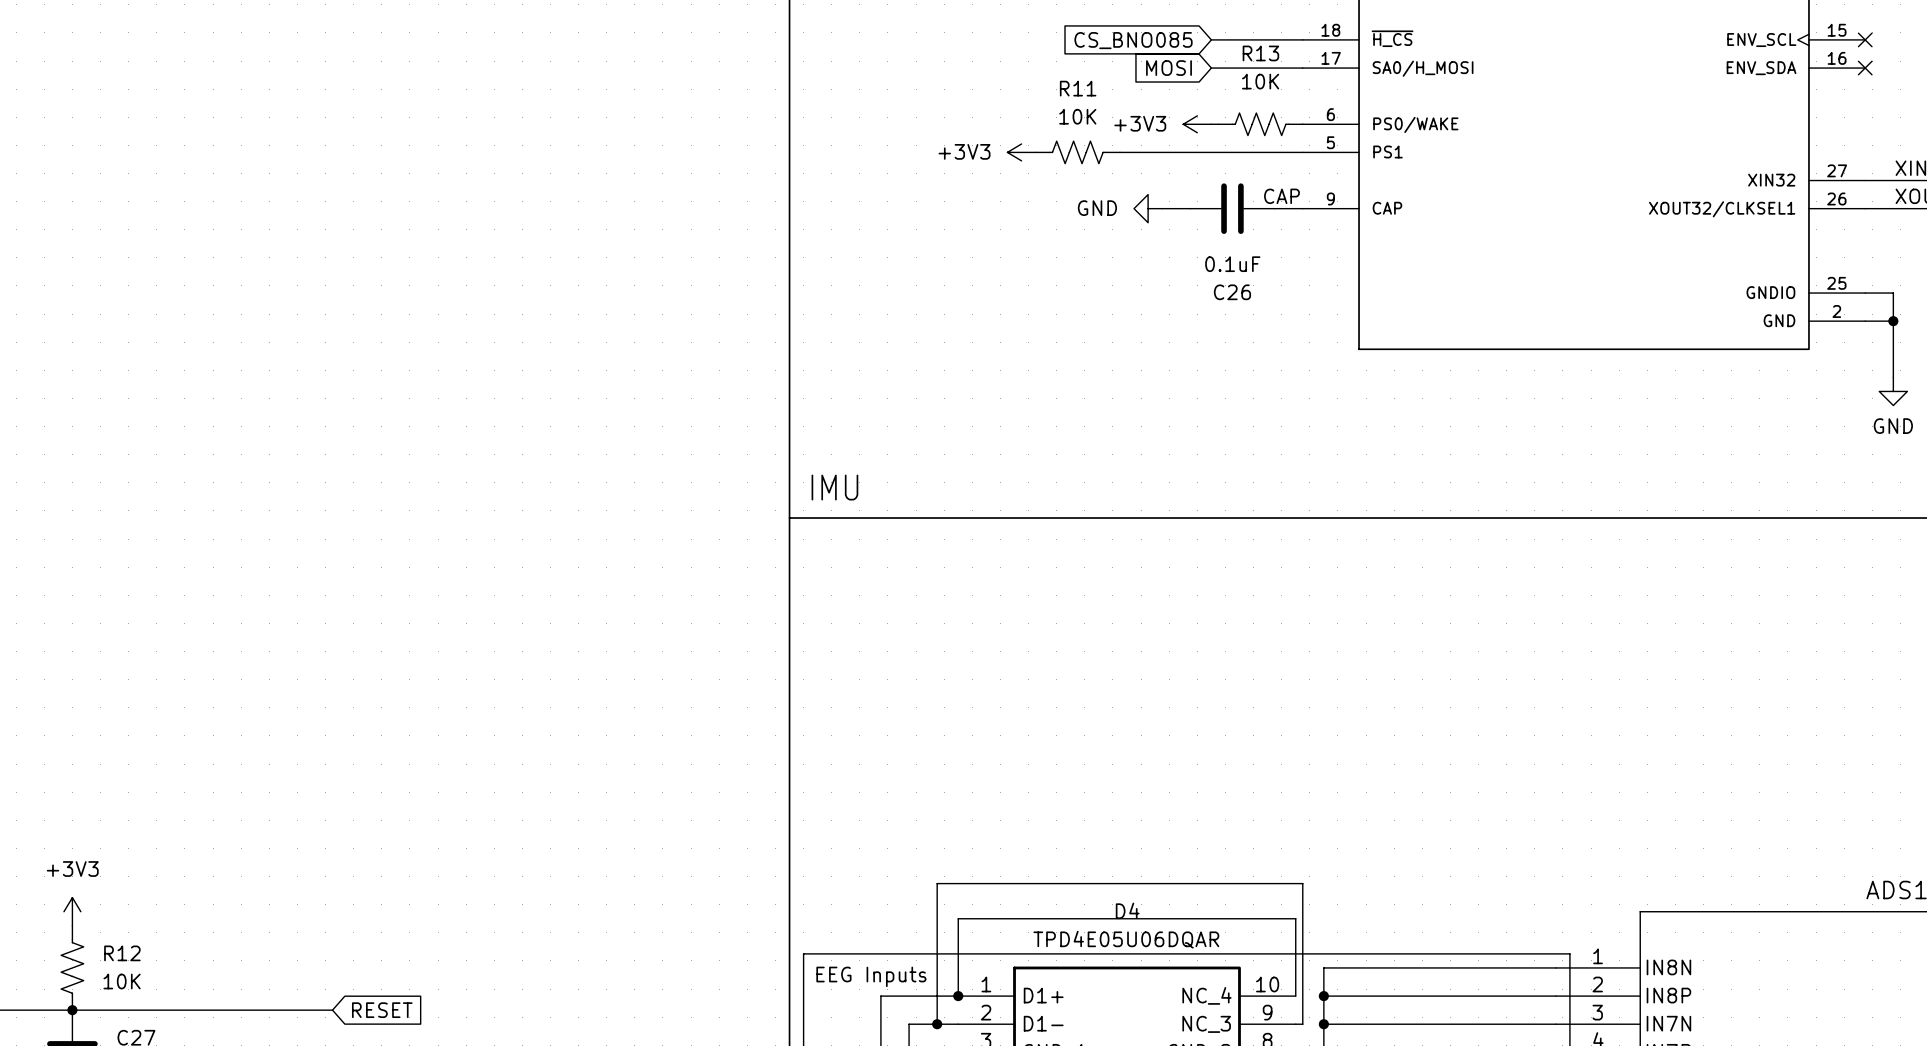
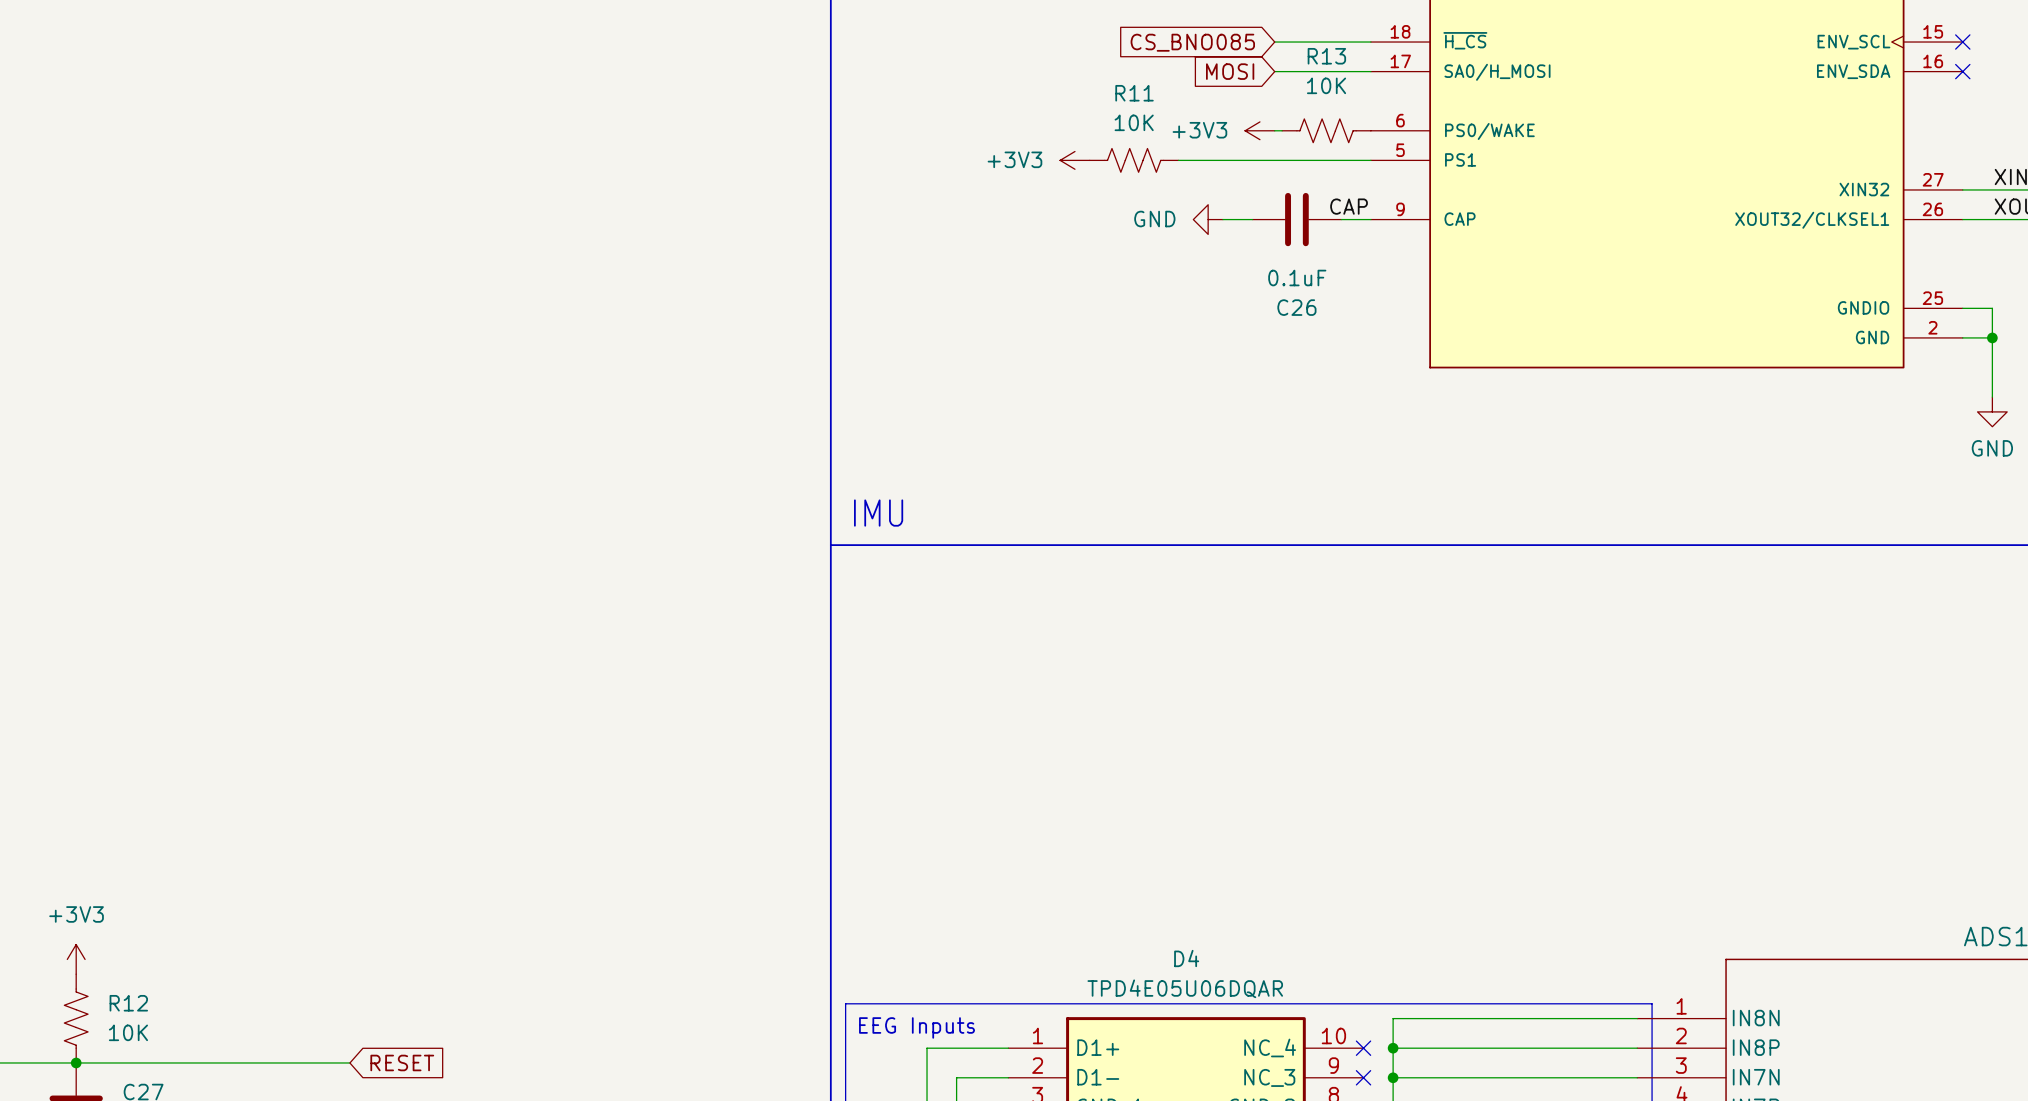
wire: (958, 996) (958, 918) (1295, 918) (1295, 996) -> none
junction: (958, 996) -> none
no-connect mark: none -> (1363, 1048)
wire: (937, 1024) (937, 883) (1302, 883) (1302, 1024) (1295, 1024) -> none
junction: (937, 1024) -> none
no-connect mark: none -> (1363, 1077)

